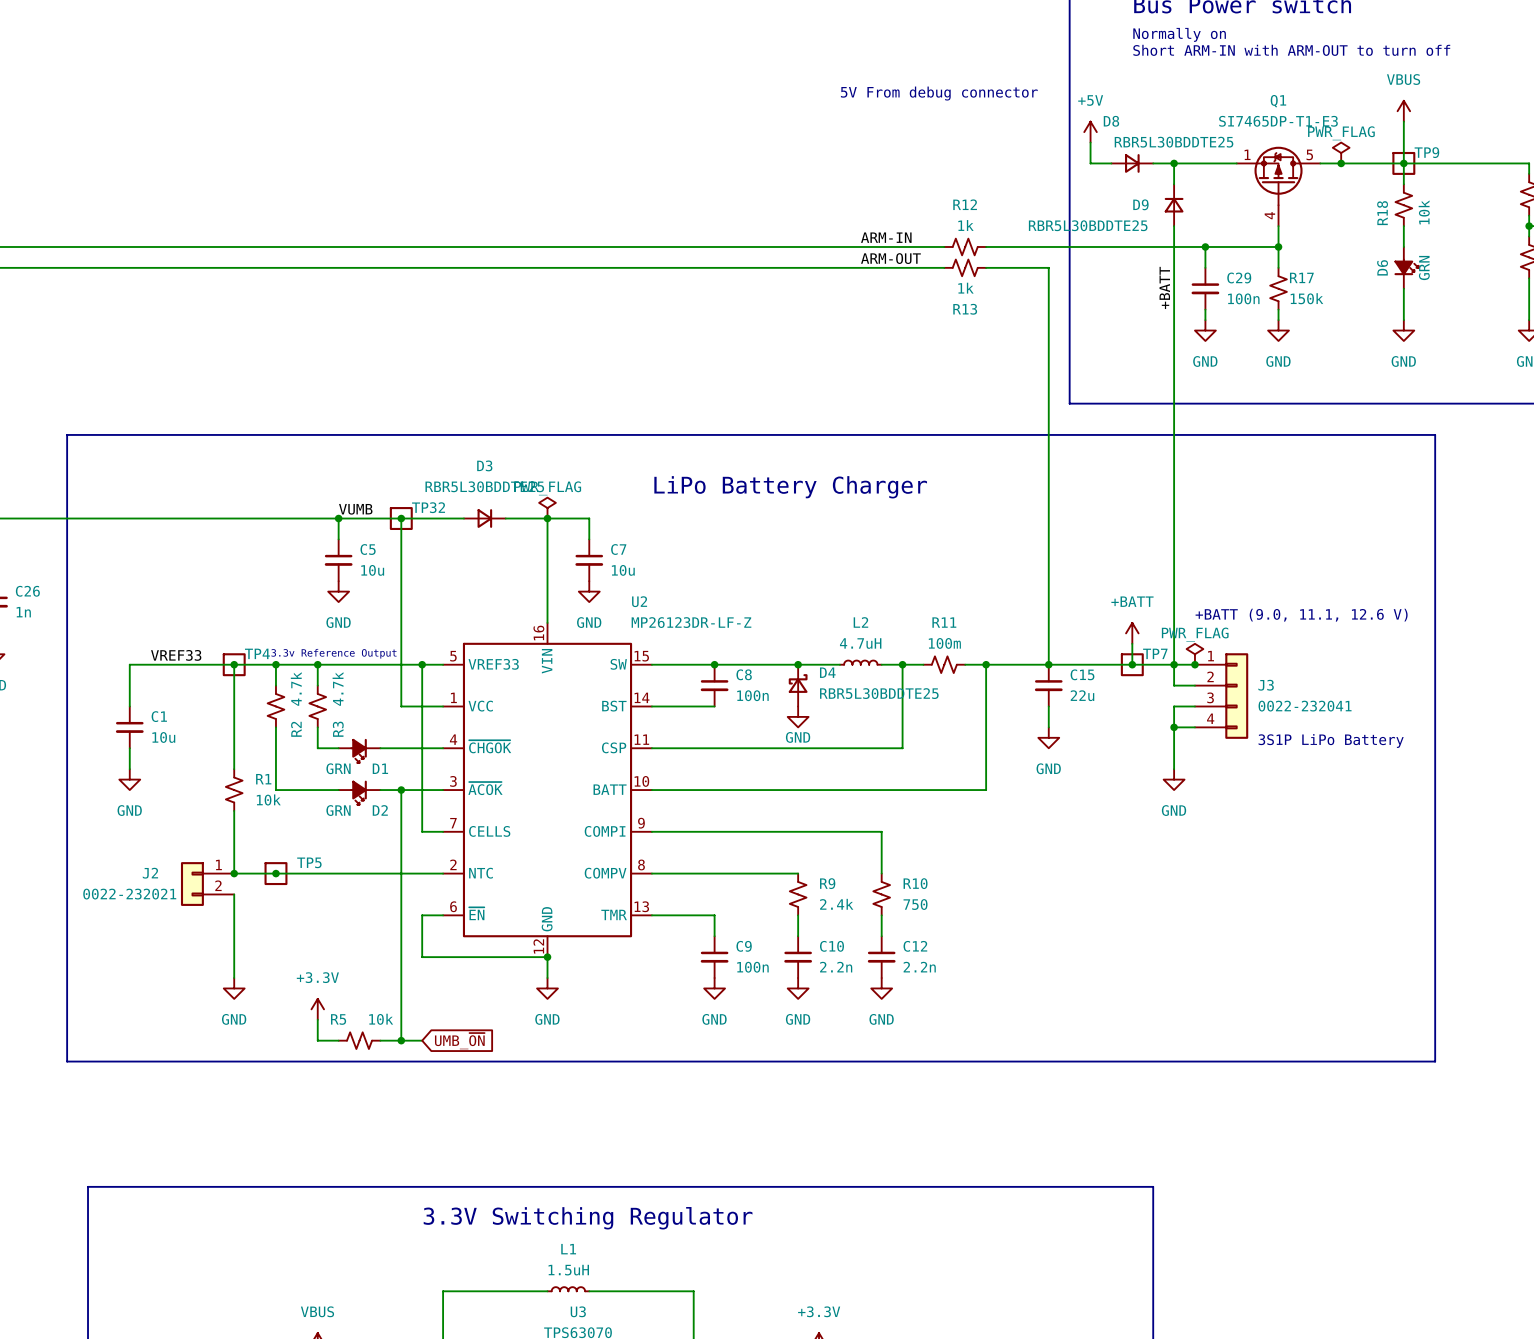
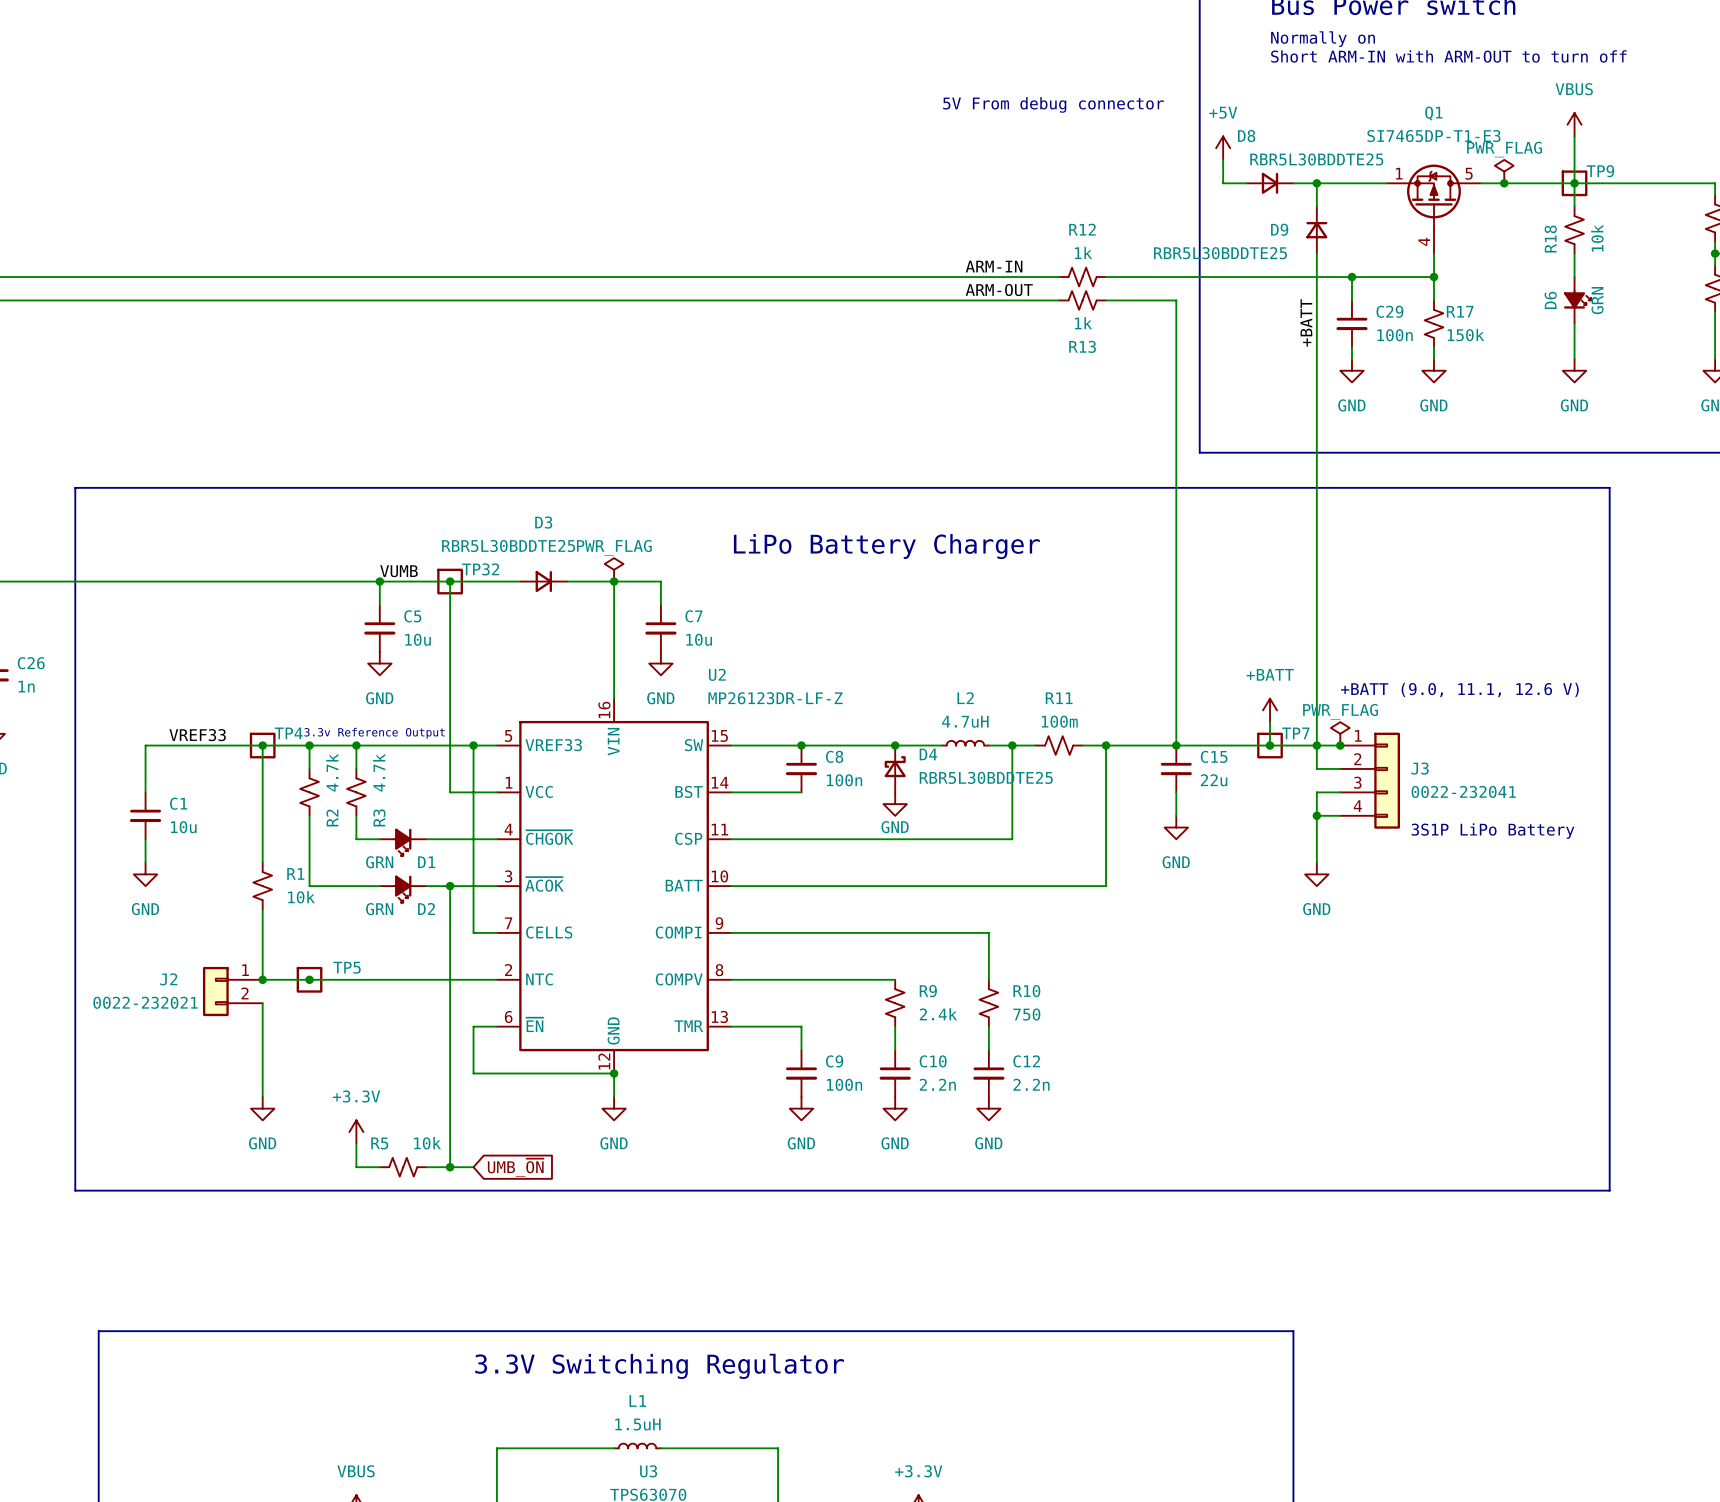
D3 value position: RBR5L30BDDTE25 (484, 486) -> RBR5L30BDDTE25 (508, 545)

